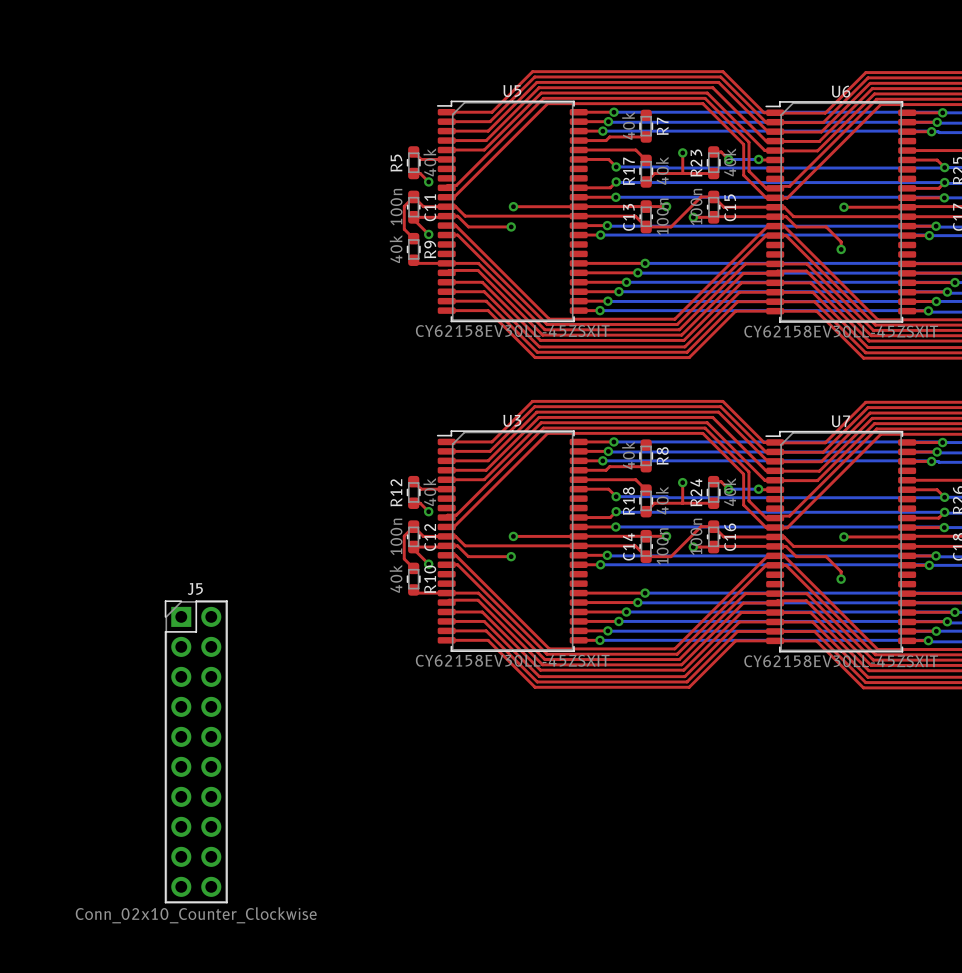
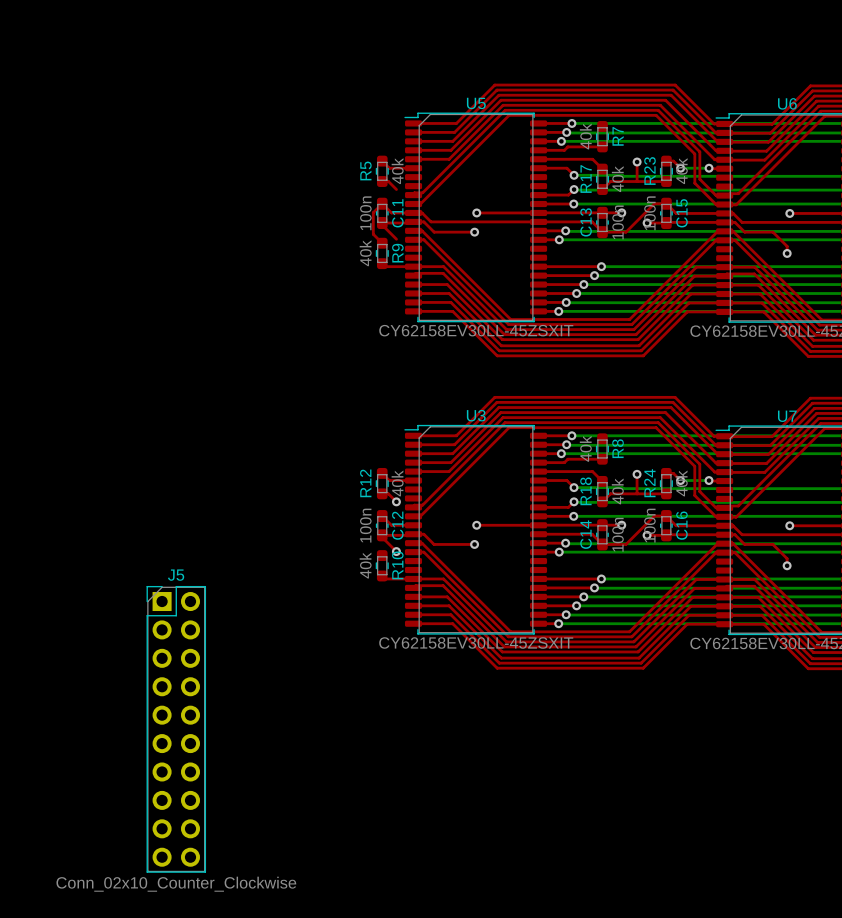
via: (428, 181) -> none
via: (428, 234) -> none
top track: (413, 526) (404, 536) (404, 558) (413, 568) -> none
top track: (446, 536) (455, 536) (465, 545) (578, 545) -> none

